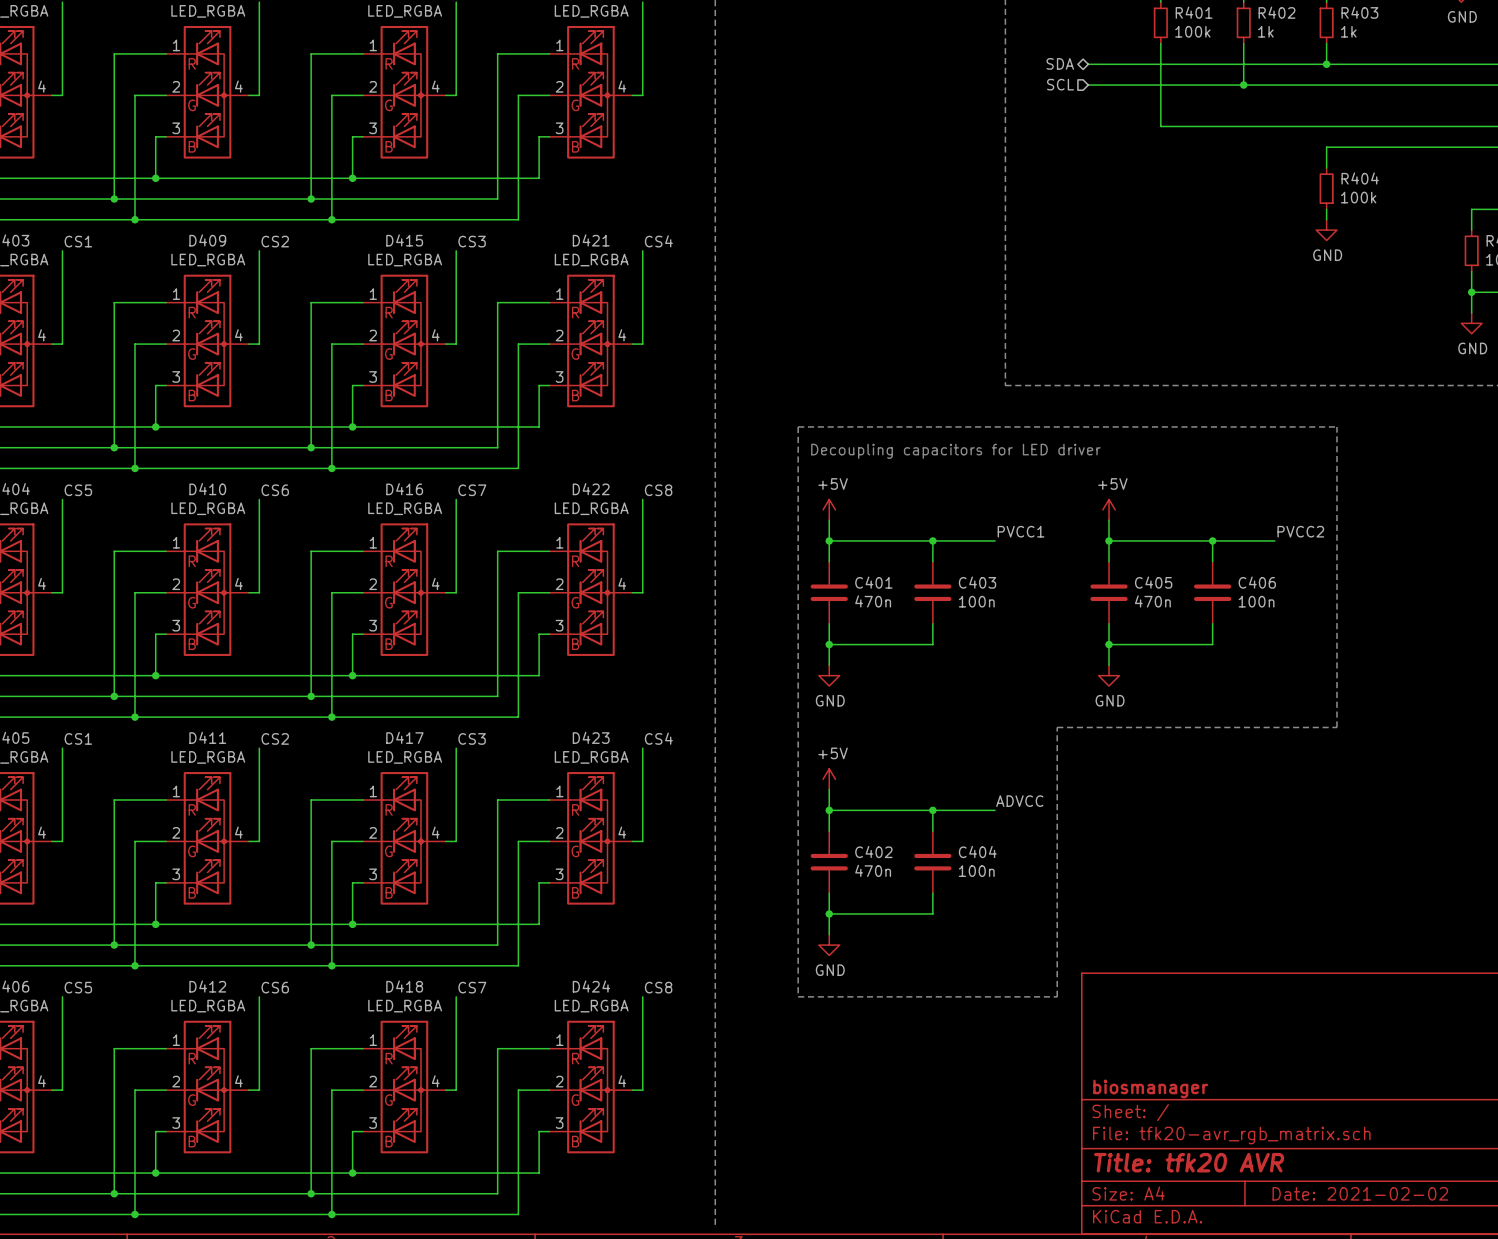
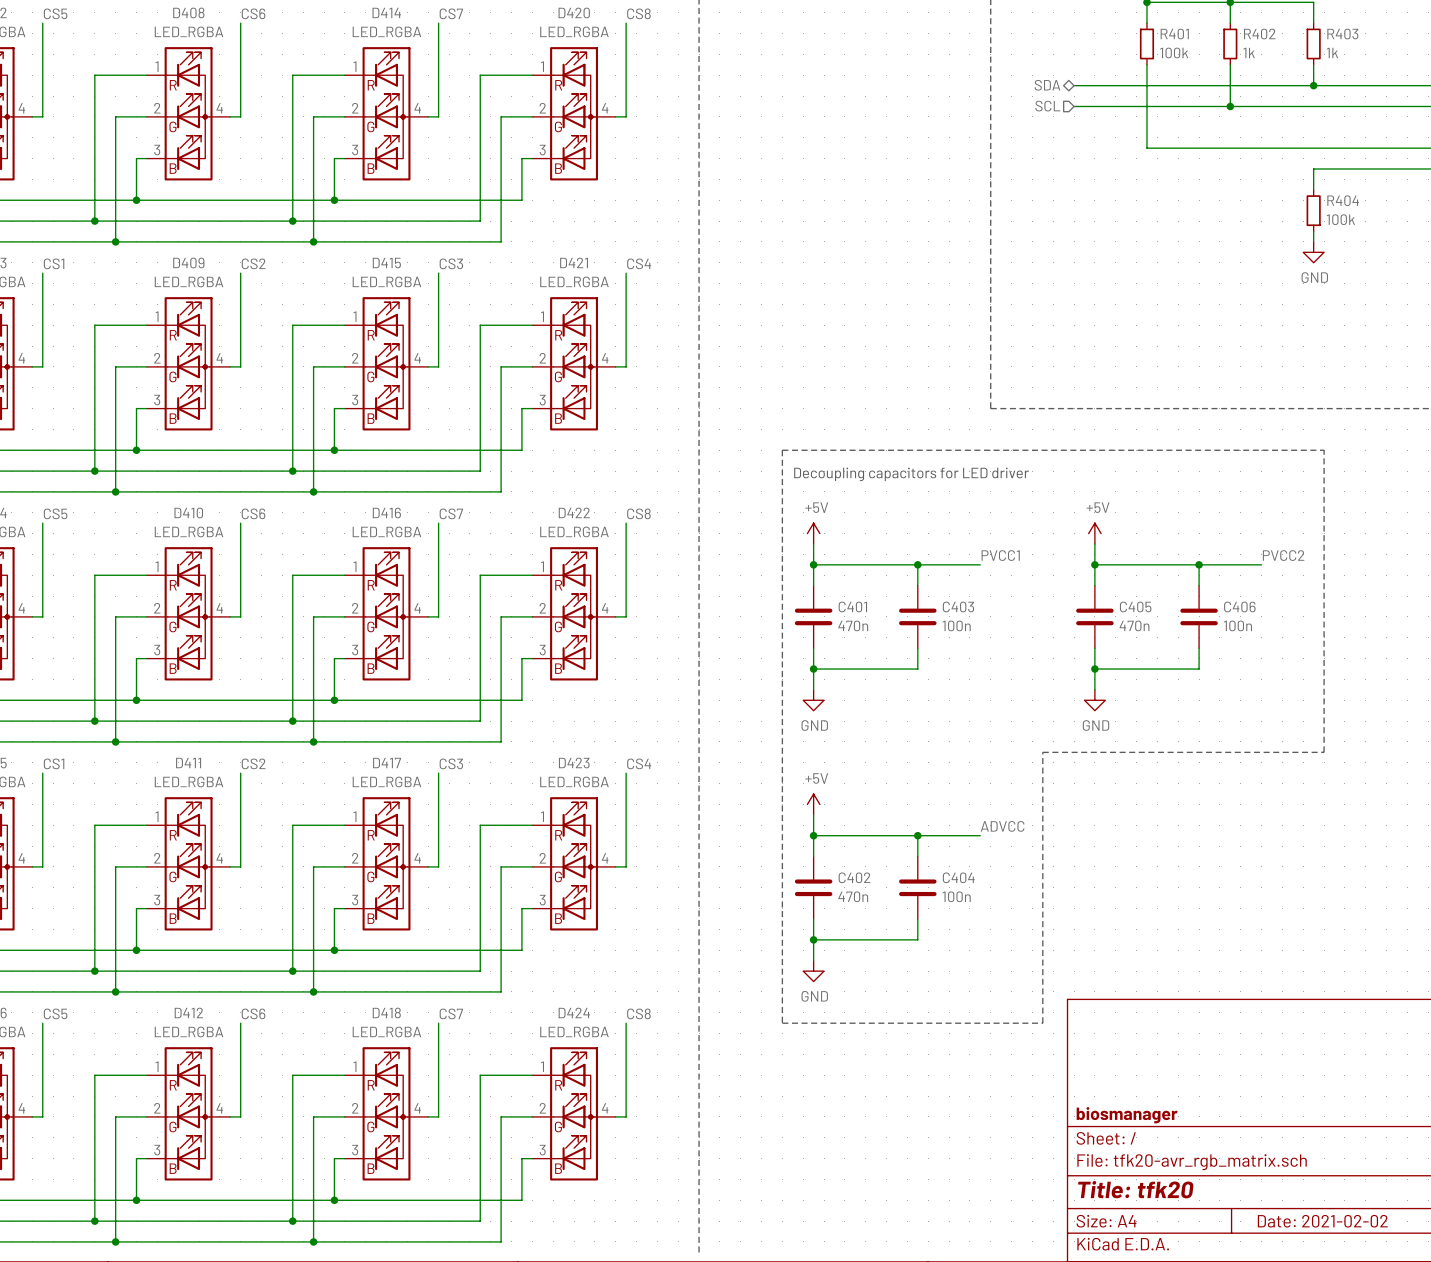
title block: Title: tfk20 AVR (1189, 1162) -> Title: tfk20 (1135, 1189)

